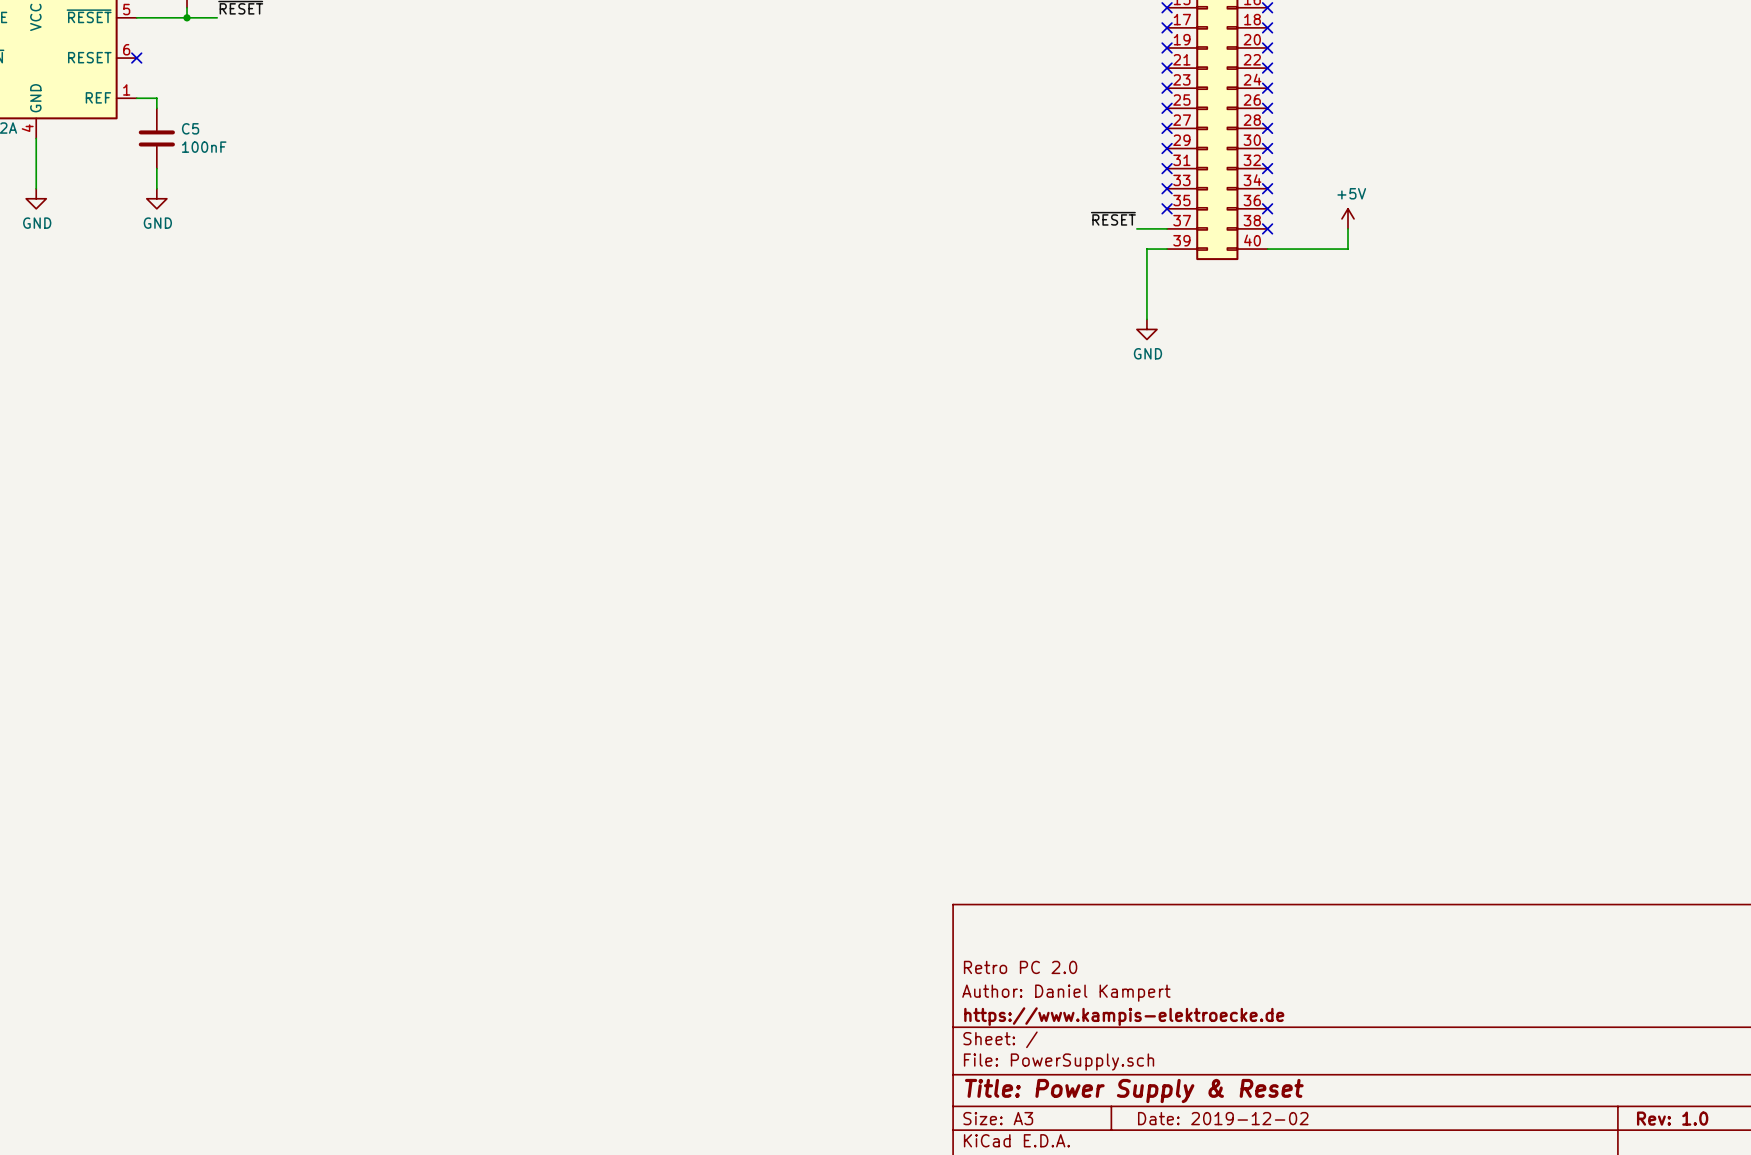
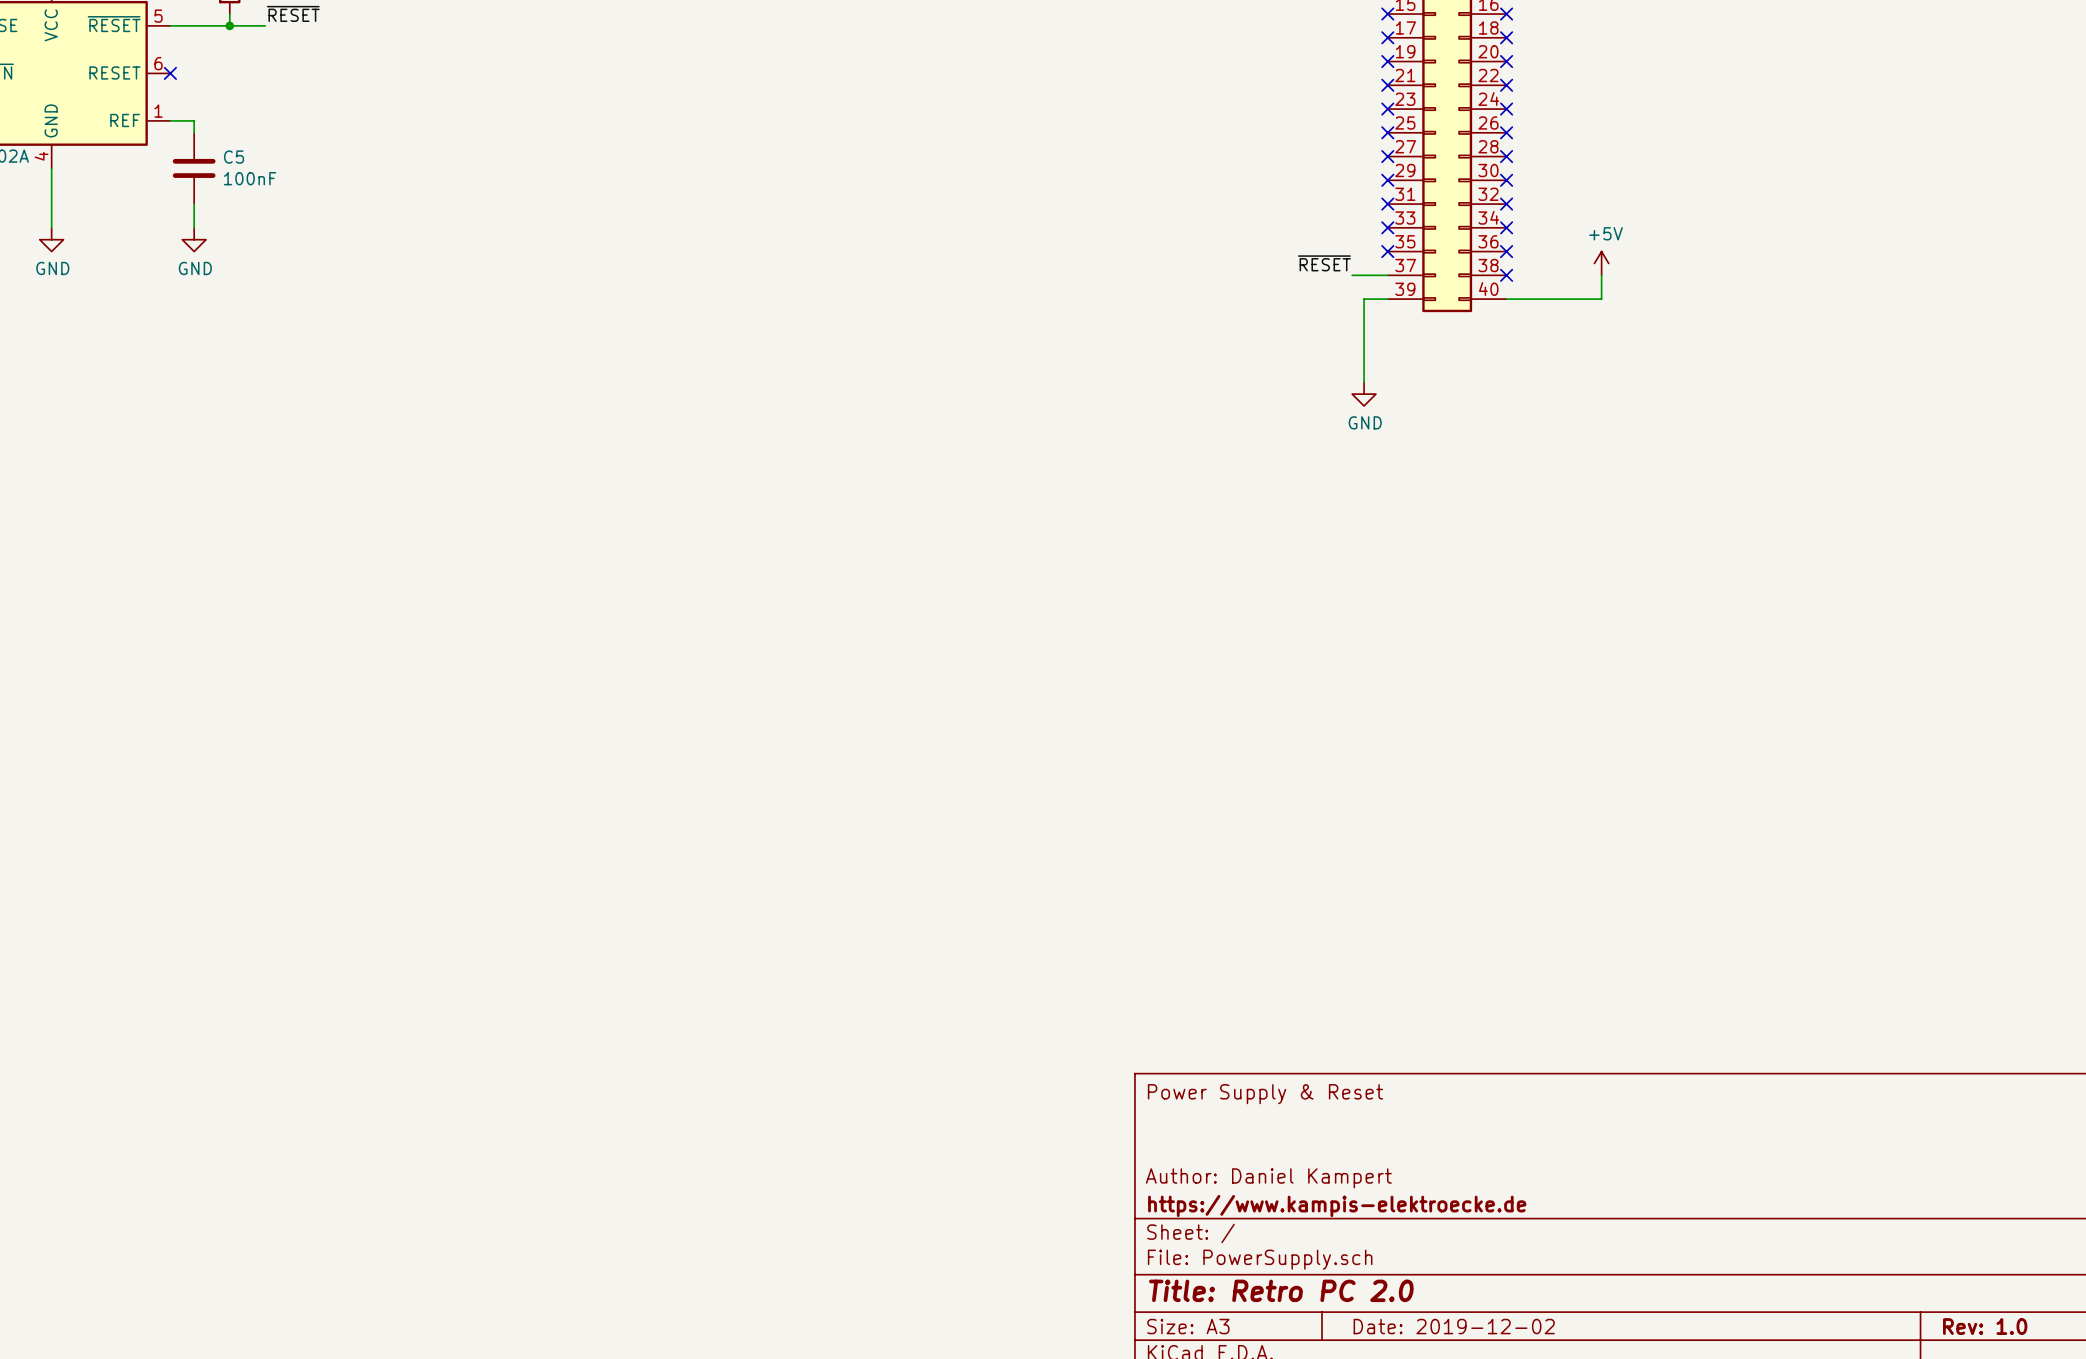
title block: none -> Power Supply & Reset (1265, 1094)
title block: Retro PC 2.0 (1020, 967) -> none
title block: Title: Power Supply & Reset (1134, 1091) -> Title: Retro PC 2.0 (1281, 1290)

